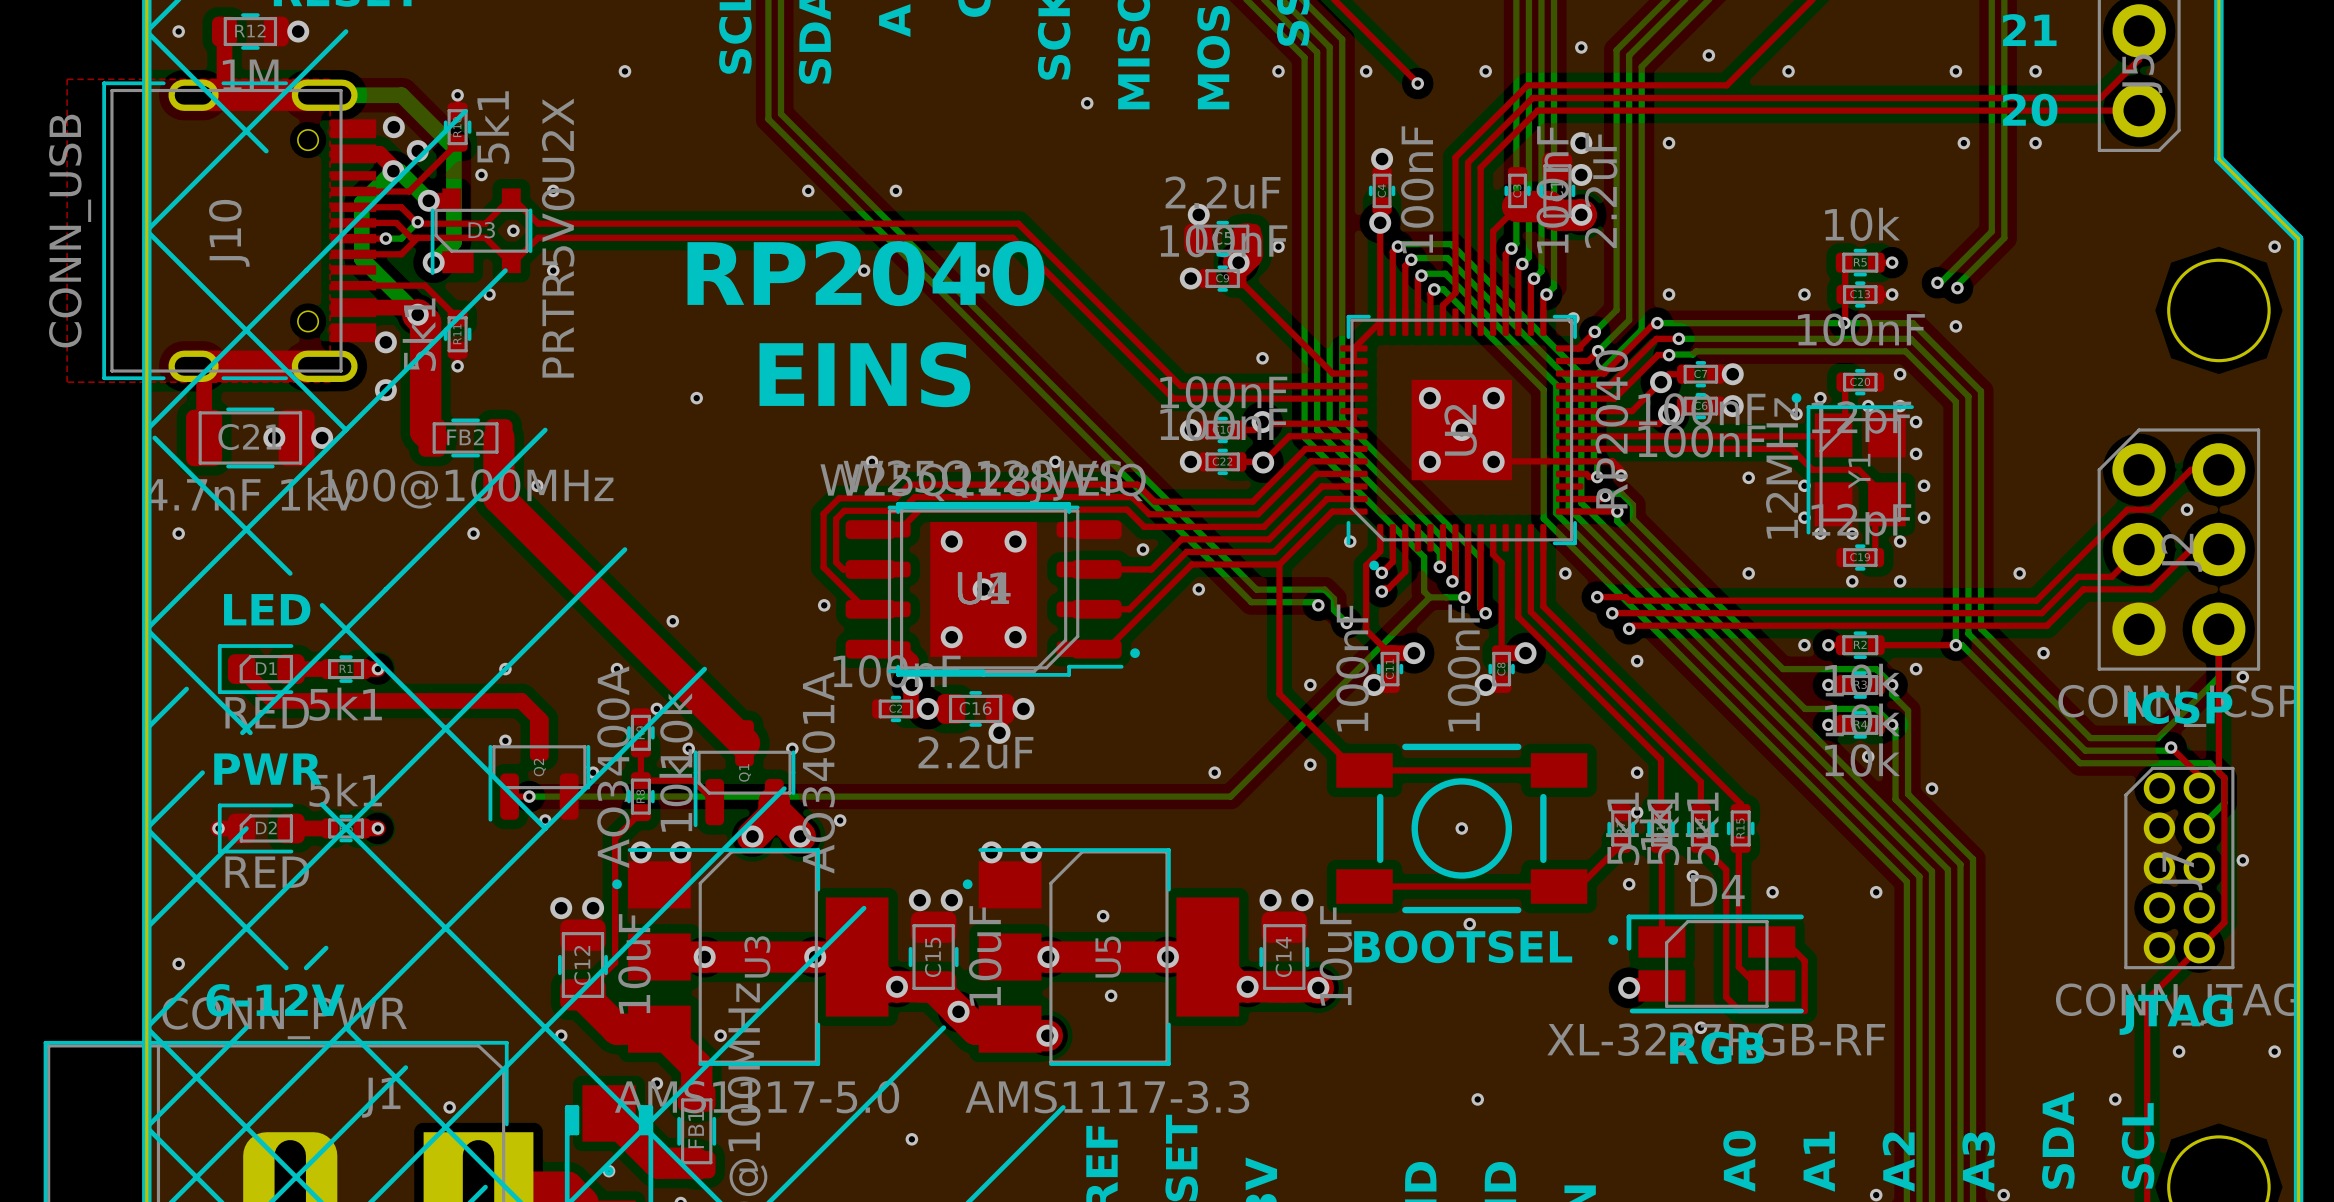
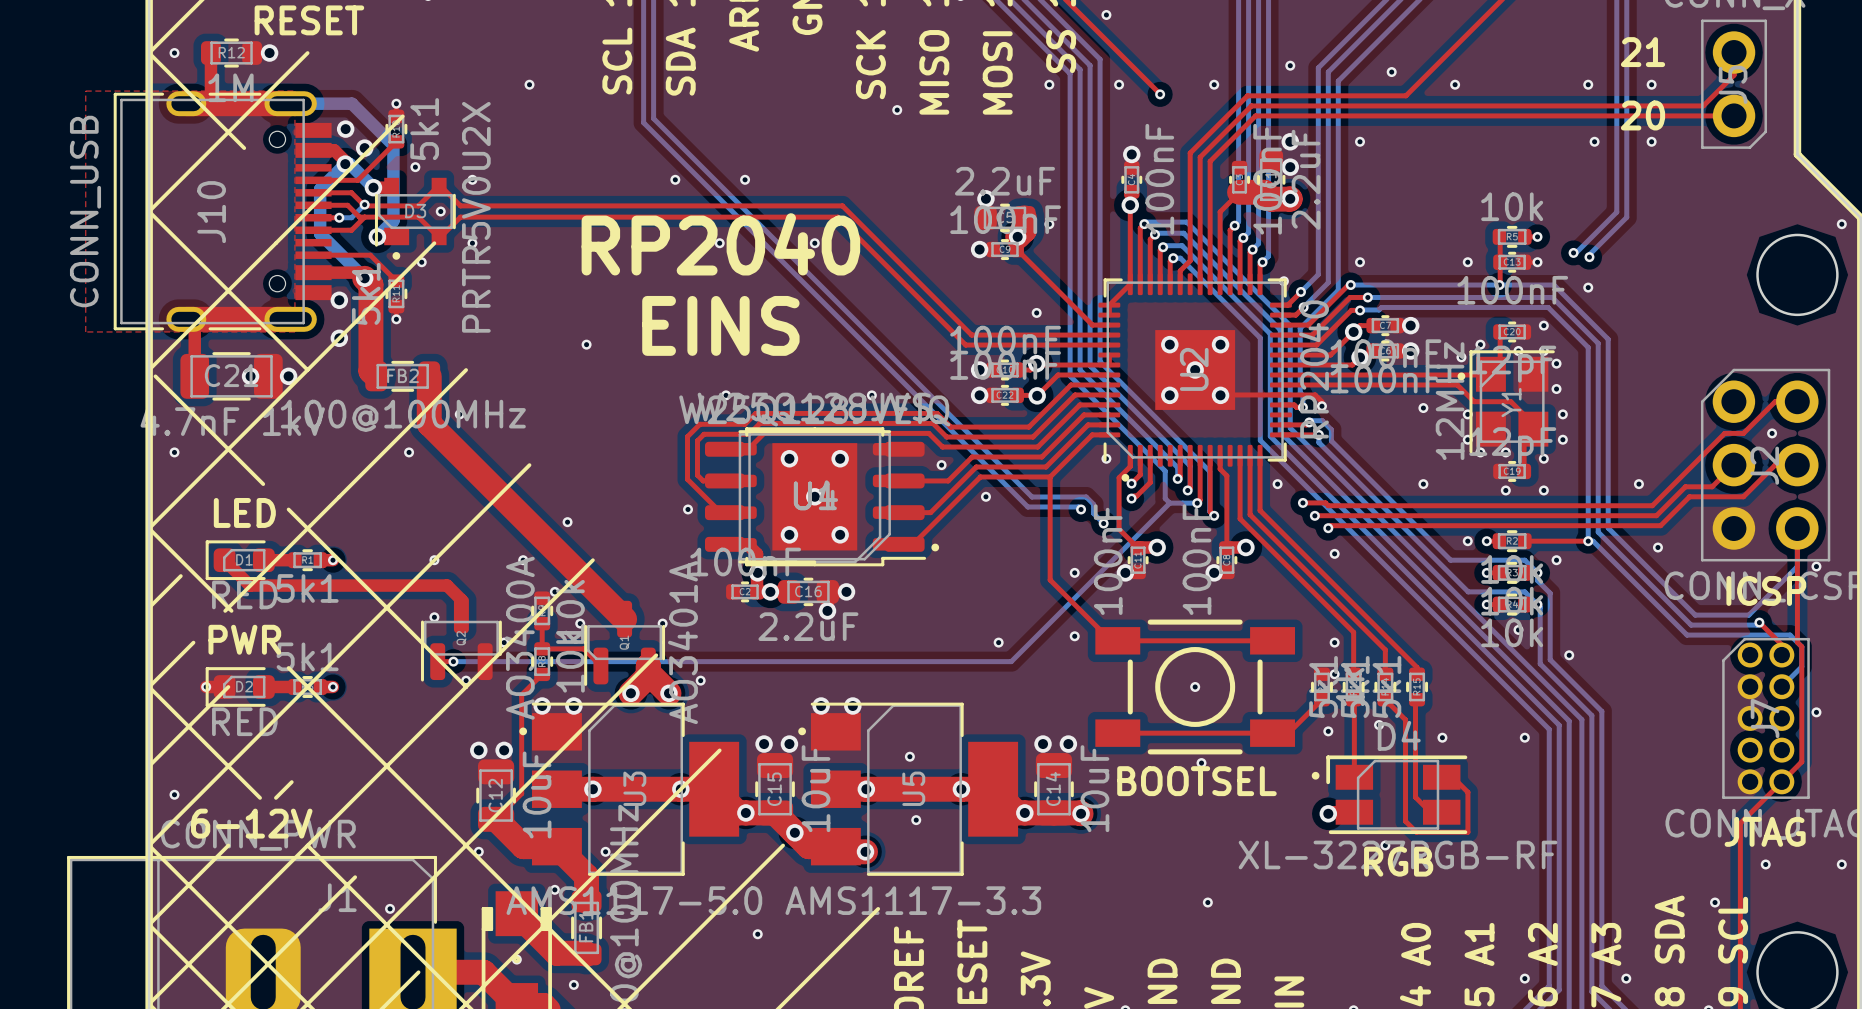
drawing: none -> [392, 252, 401, 260]
drawing position: (1796, 398) -> (1461, 376)

